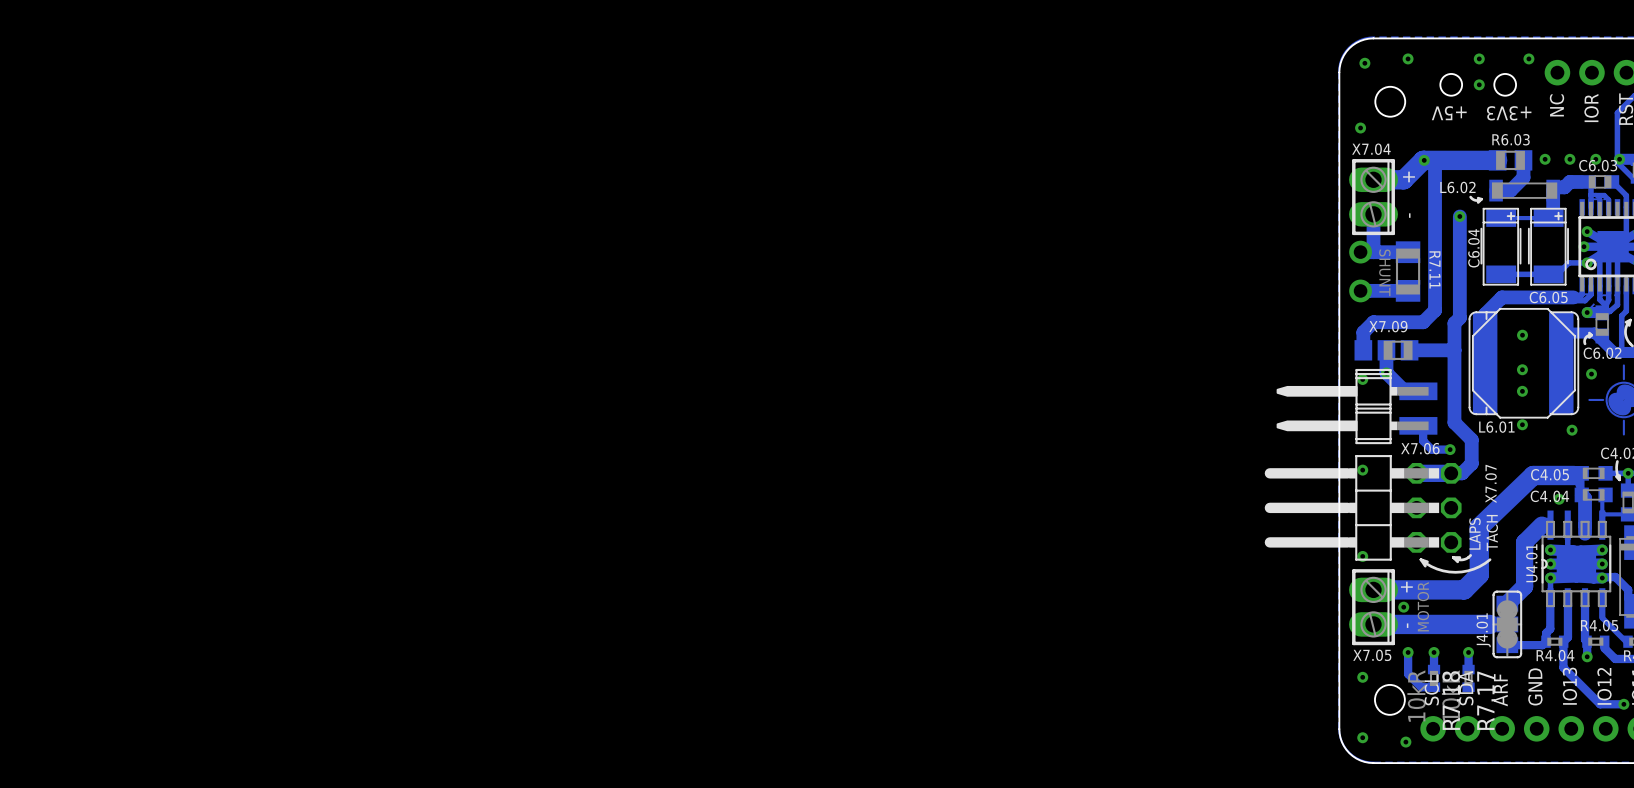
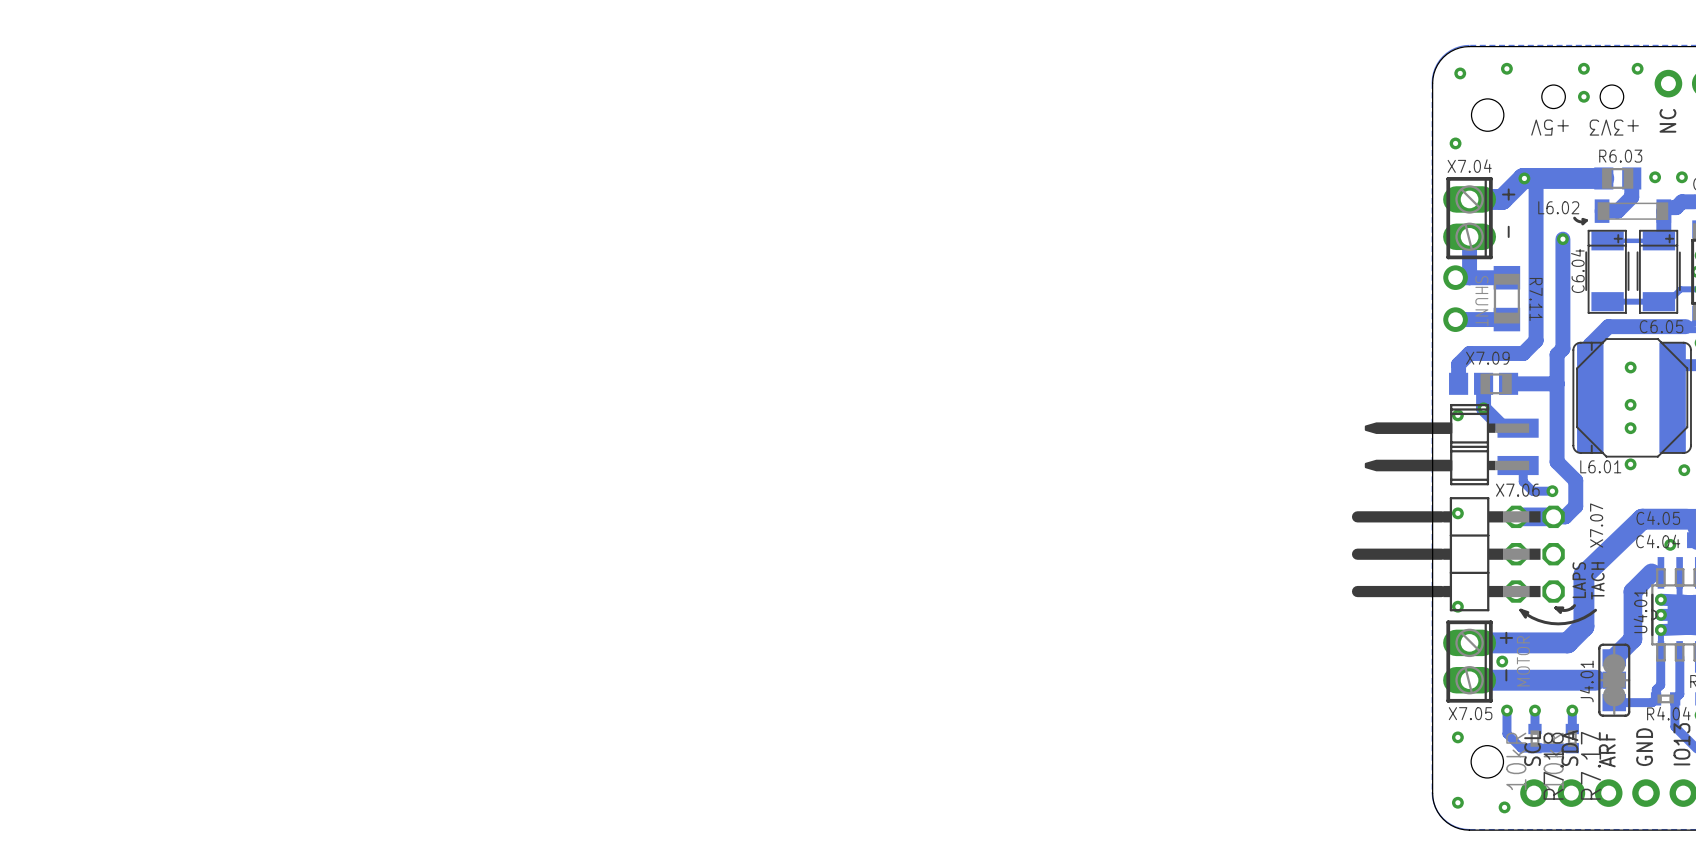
track: none -> (1572, 748) (1534, 748)

